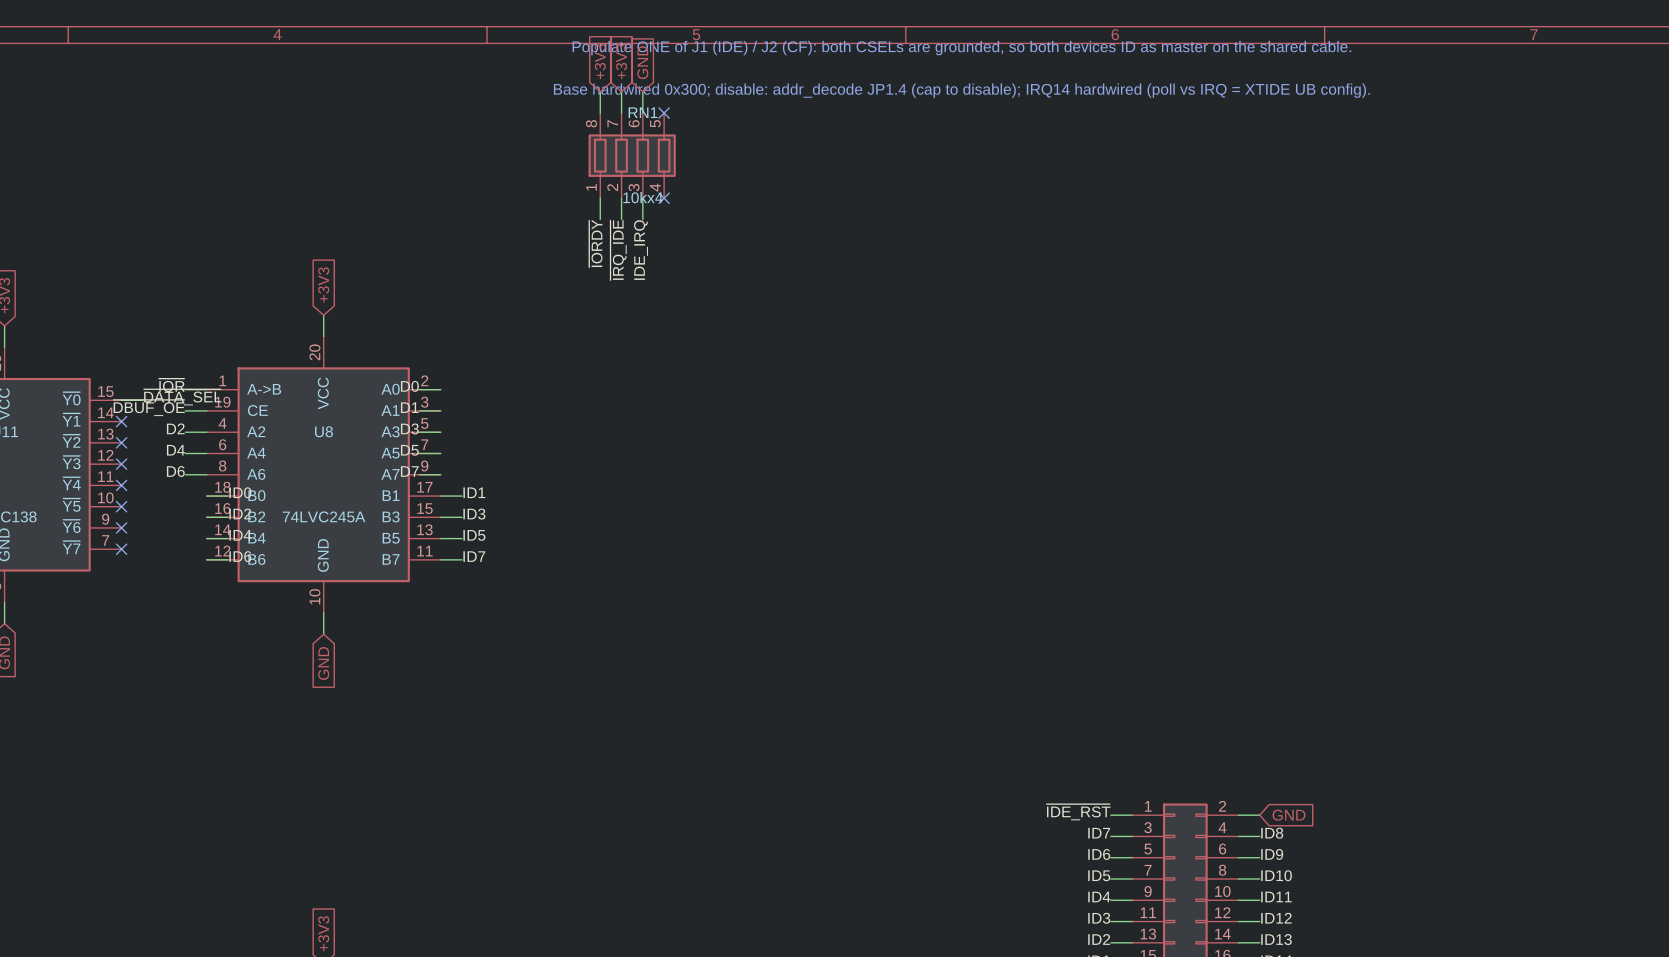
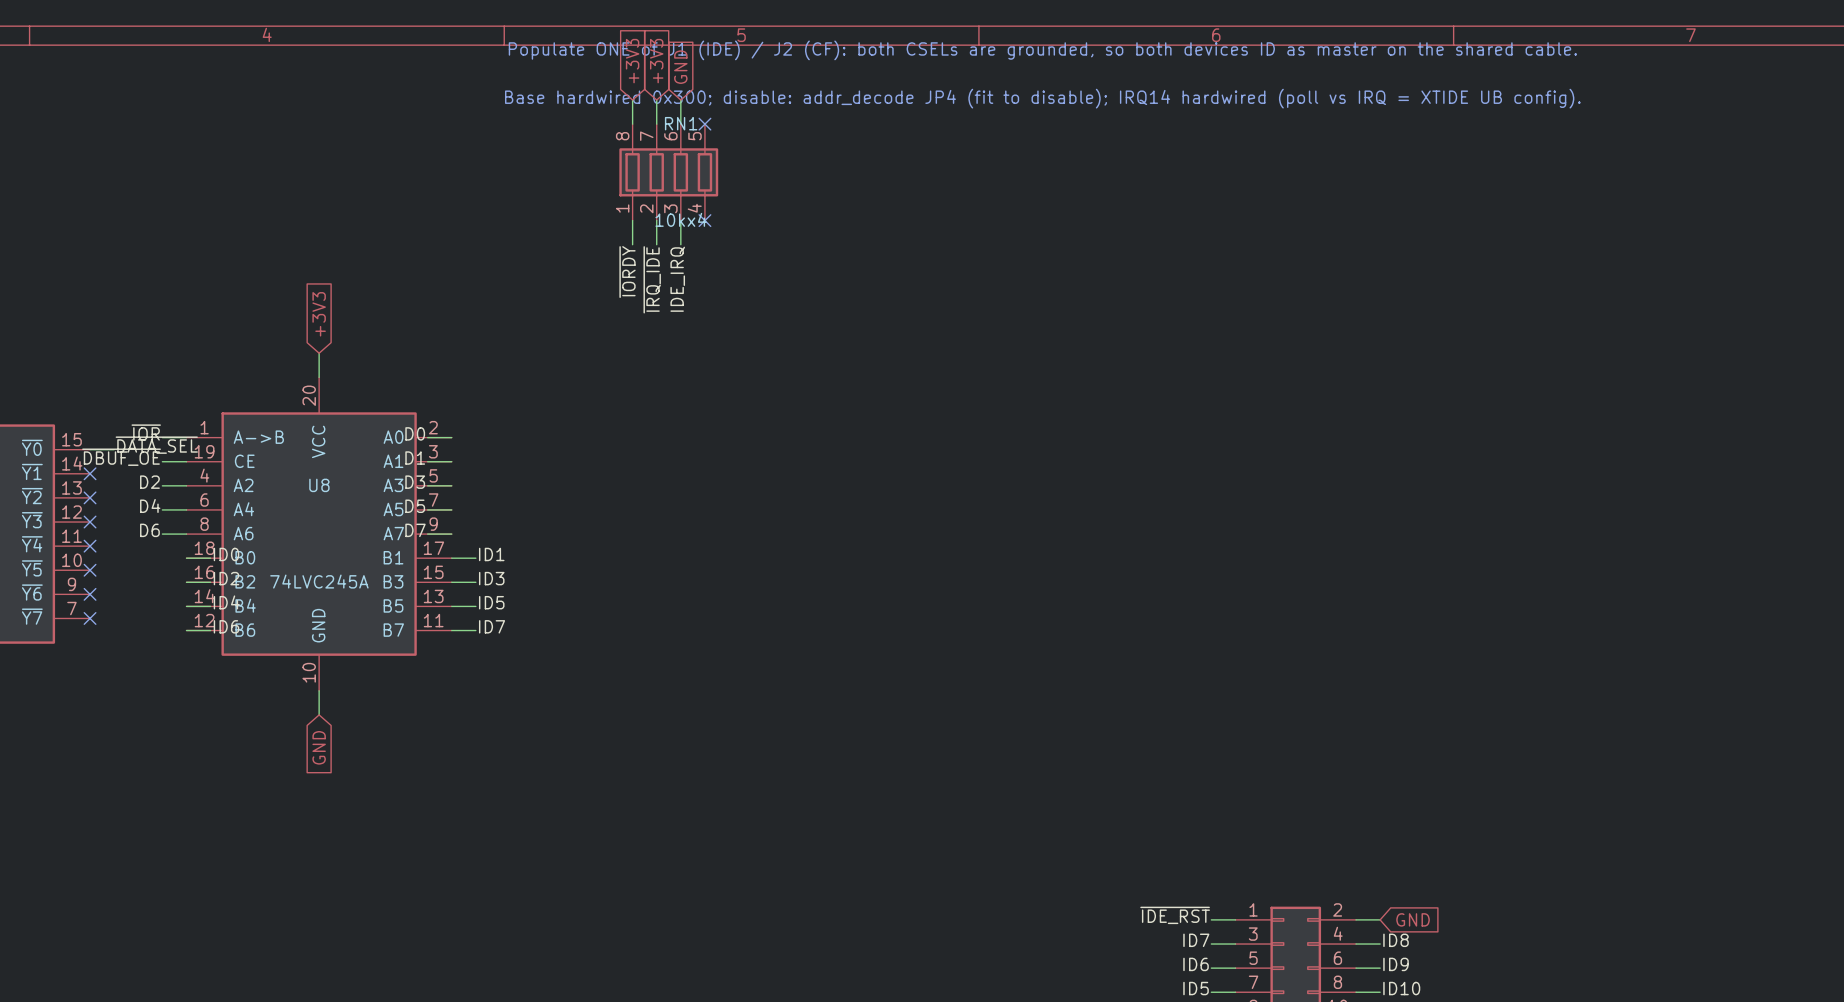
text: Base hardwired 0x300; disable: addr_decode JP1.4 (cap to disable); IRQ14 hardwired (poll vs IRQ = XTIDE UB config). (961, 90) -> Base hardwired 0x300; disable: addr_decode JP4 (fit to disable); IRQ14 hardwired (poll vs IRQ = XTIDE UB config). (1042, 98)

